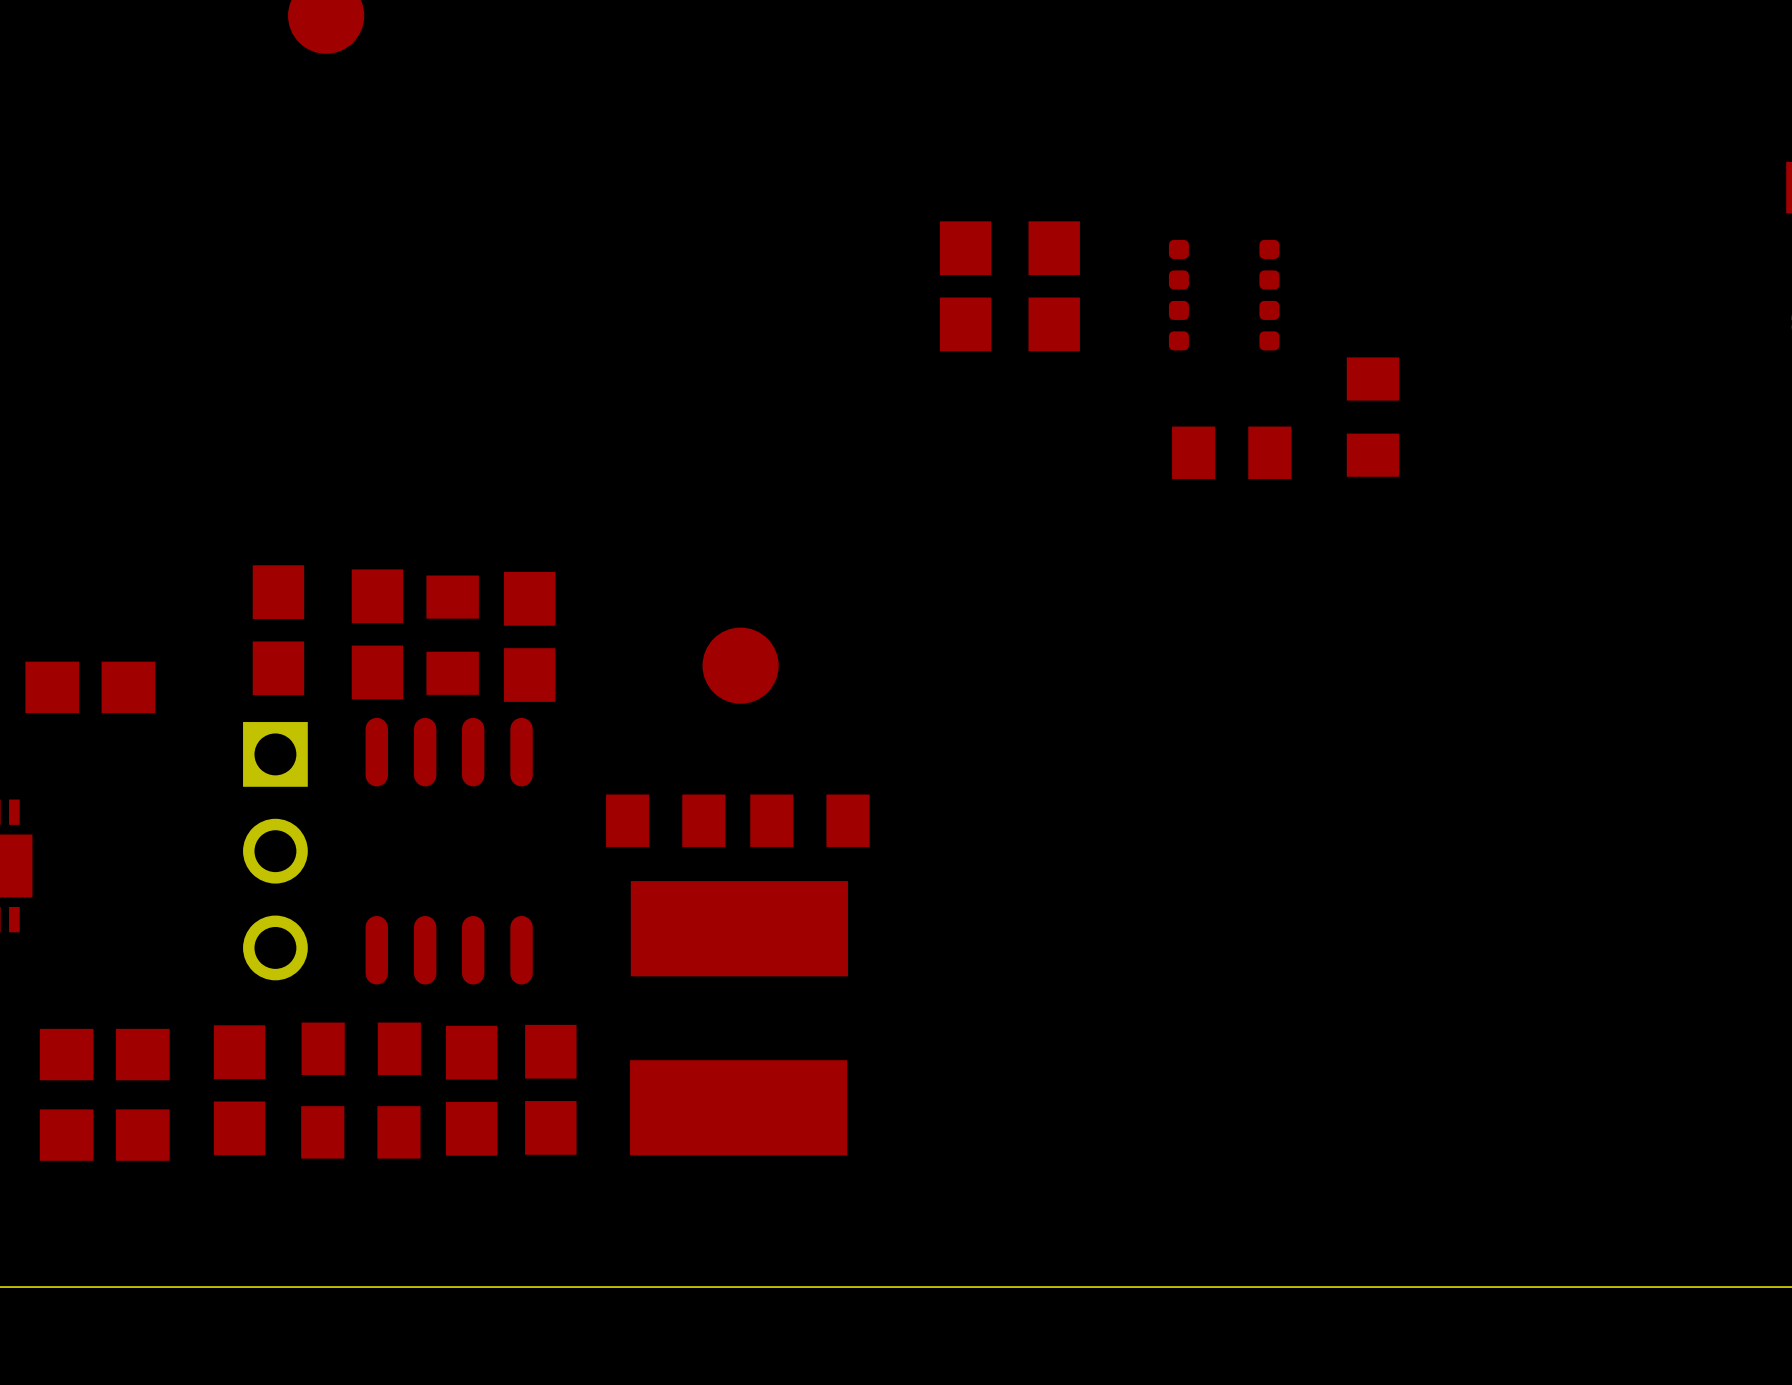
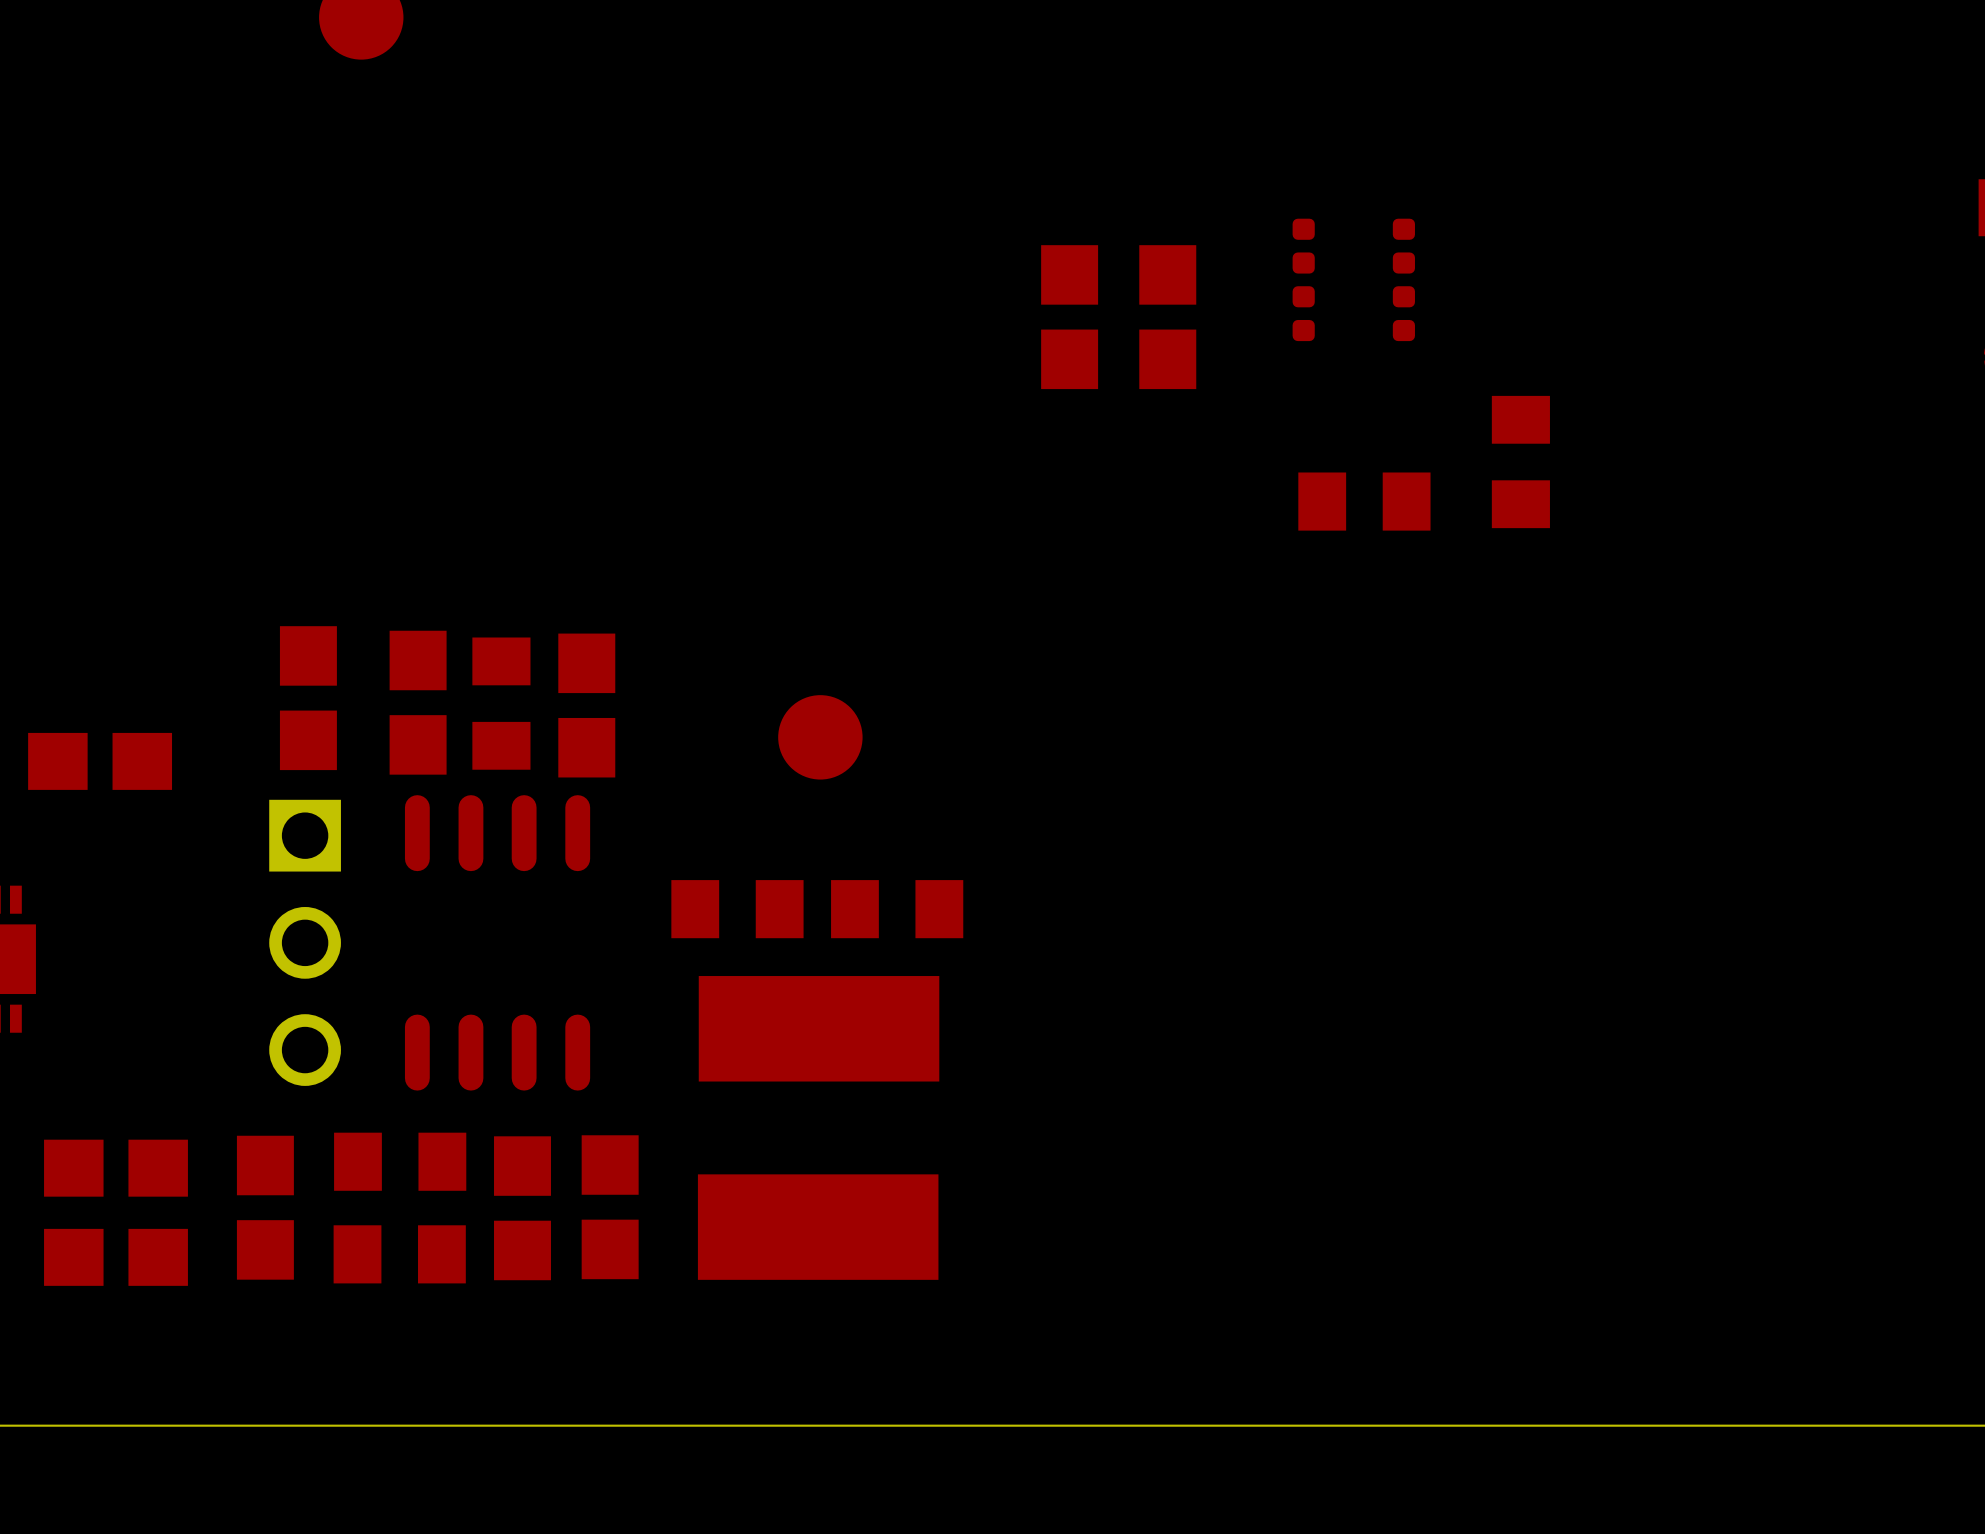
part position: (1224, 295) -> (1353, 279)

